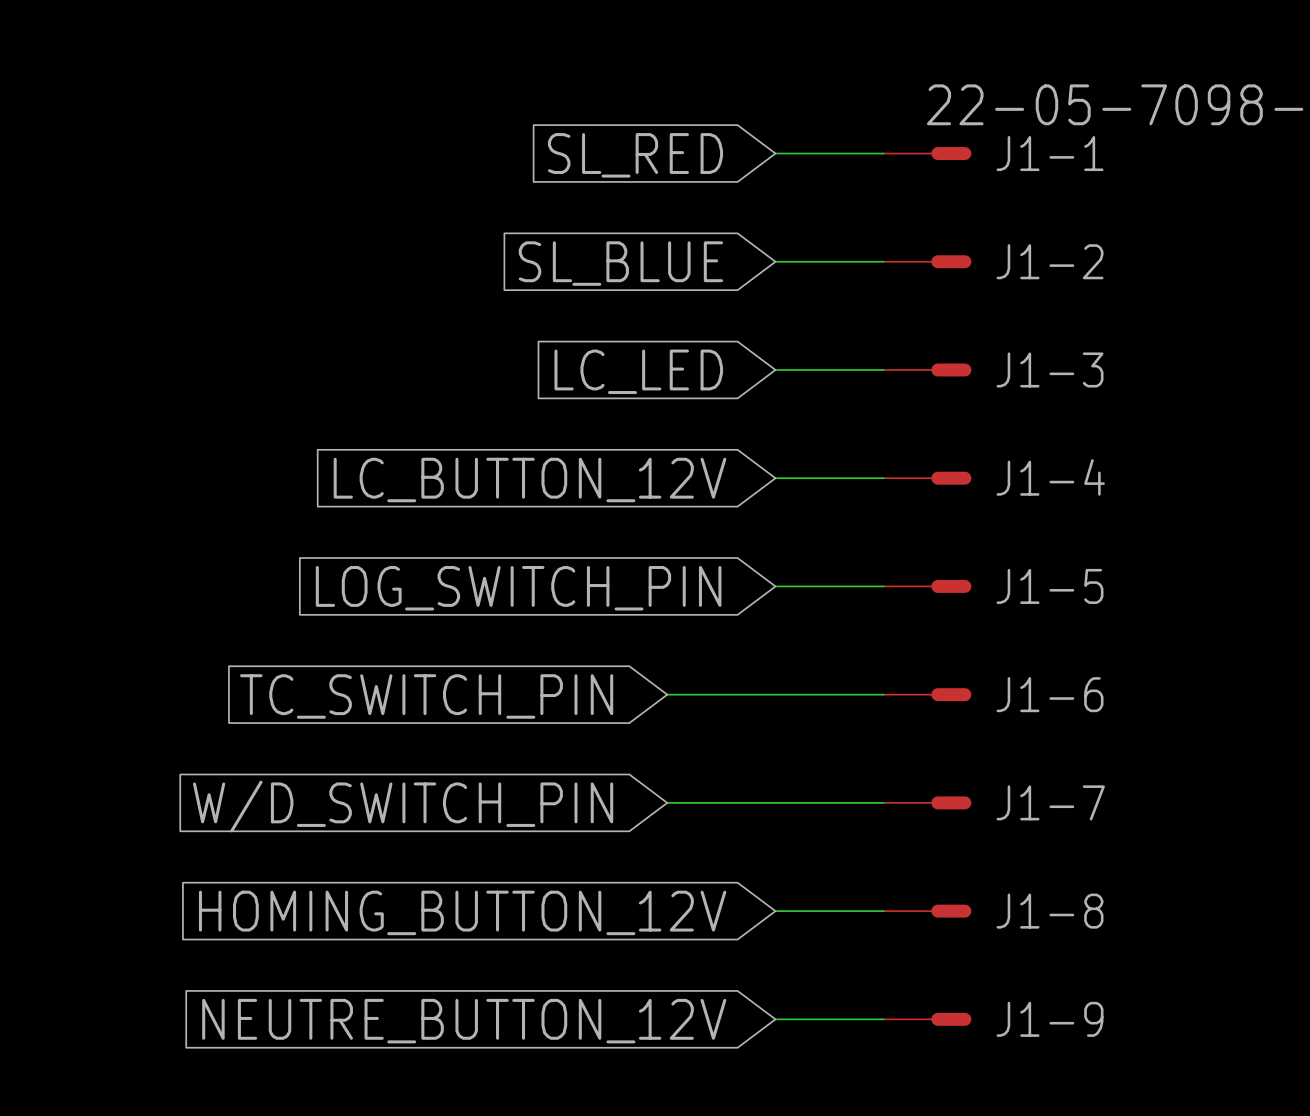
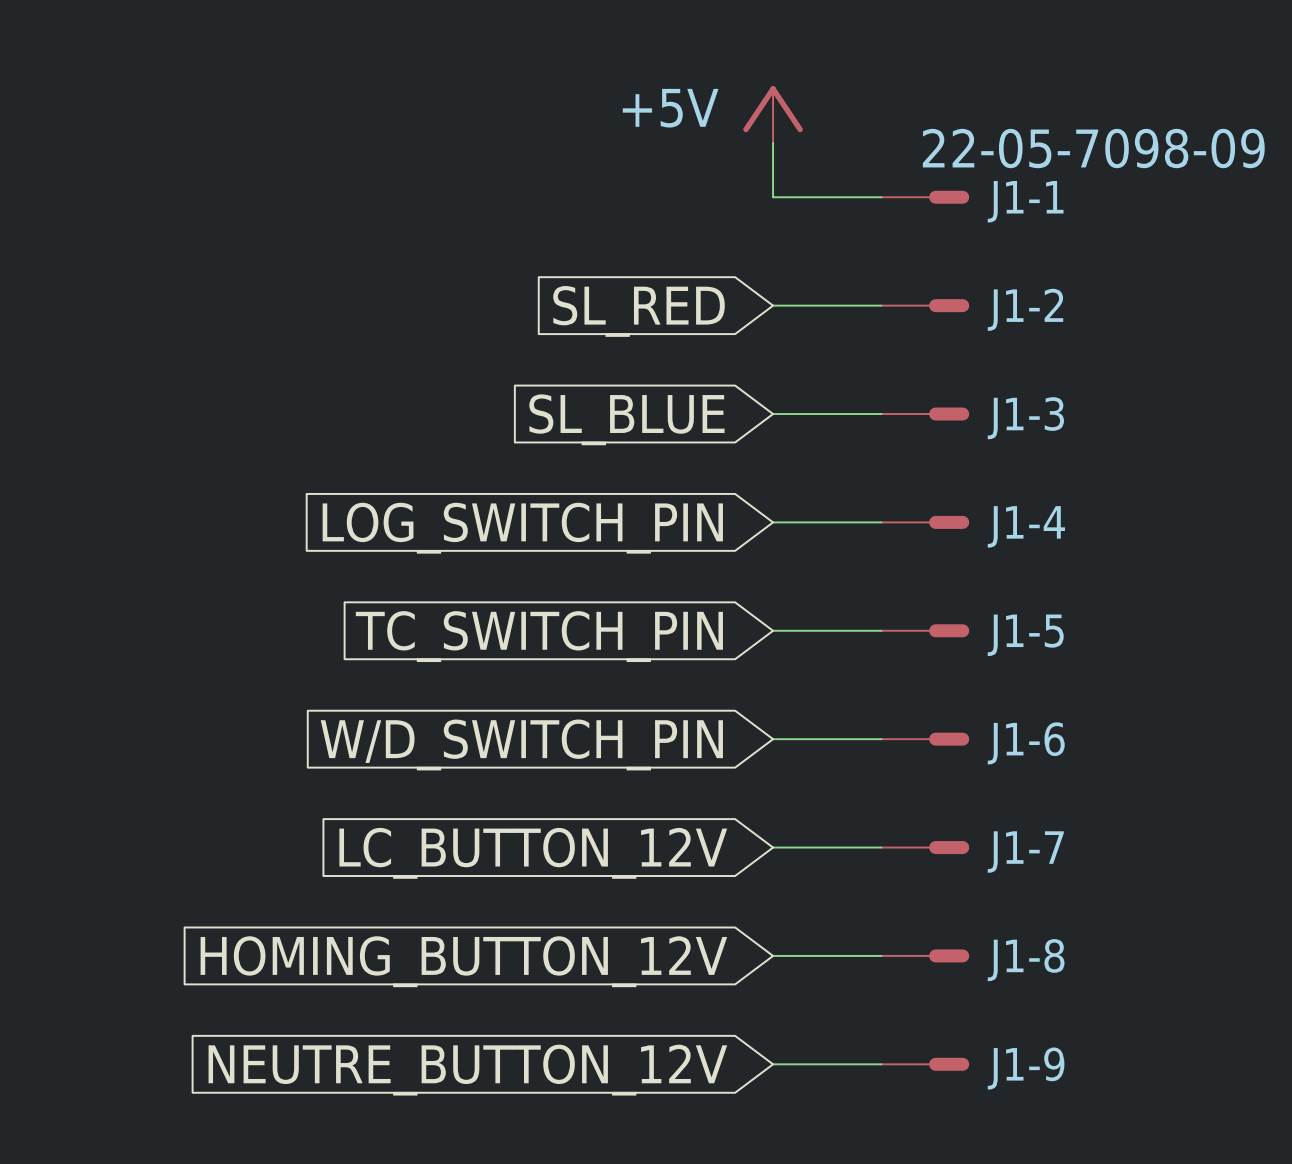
power symbol: none -> +5V (773, 114)
wire: none -> (773, 143) (773, 197)
global label: SL_RED (635, 155) -> none
global label: SL_BLUE (620, 263) -> SL_RED (639, 311)
global label: LC_LED (638, 371) -> SL_BLUE (626, 419)
global label: LC_BUTTON_12V (529, 480) -> LOG_SWITCH_PIN (522, 528)
global label: LOG_SWITCH_PIN (518, 588) -> TC_SWITCH_PIN (539, 636)
wire: (667, 694) (775, 694) -> none
global label: TC_SWITCH_PIN (426, 696) -> none
wire: (667, 802) (775, 802) -> none
global label: none -> LC_BUTTON_12V (533, 853)
global label position: W/D_SWITCH_PIN (403, 806) -> W/D_SWITCH_PIN (521, 744)

